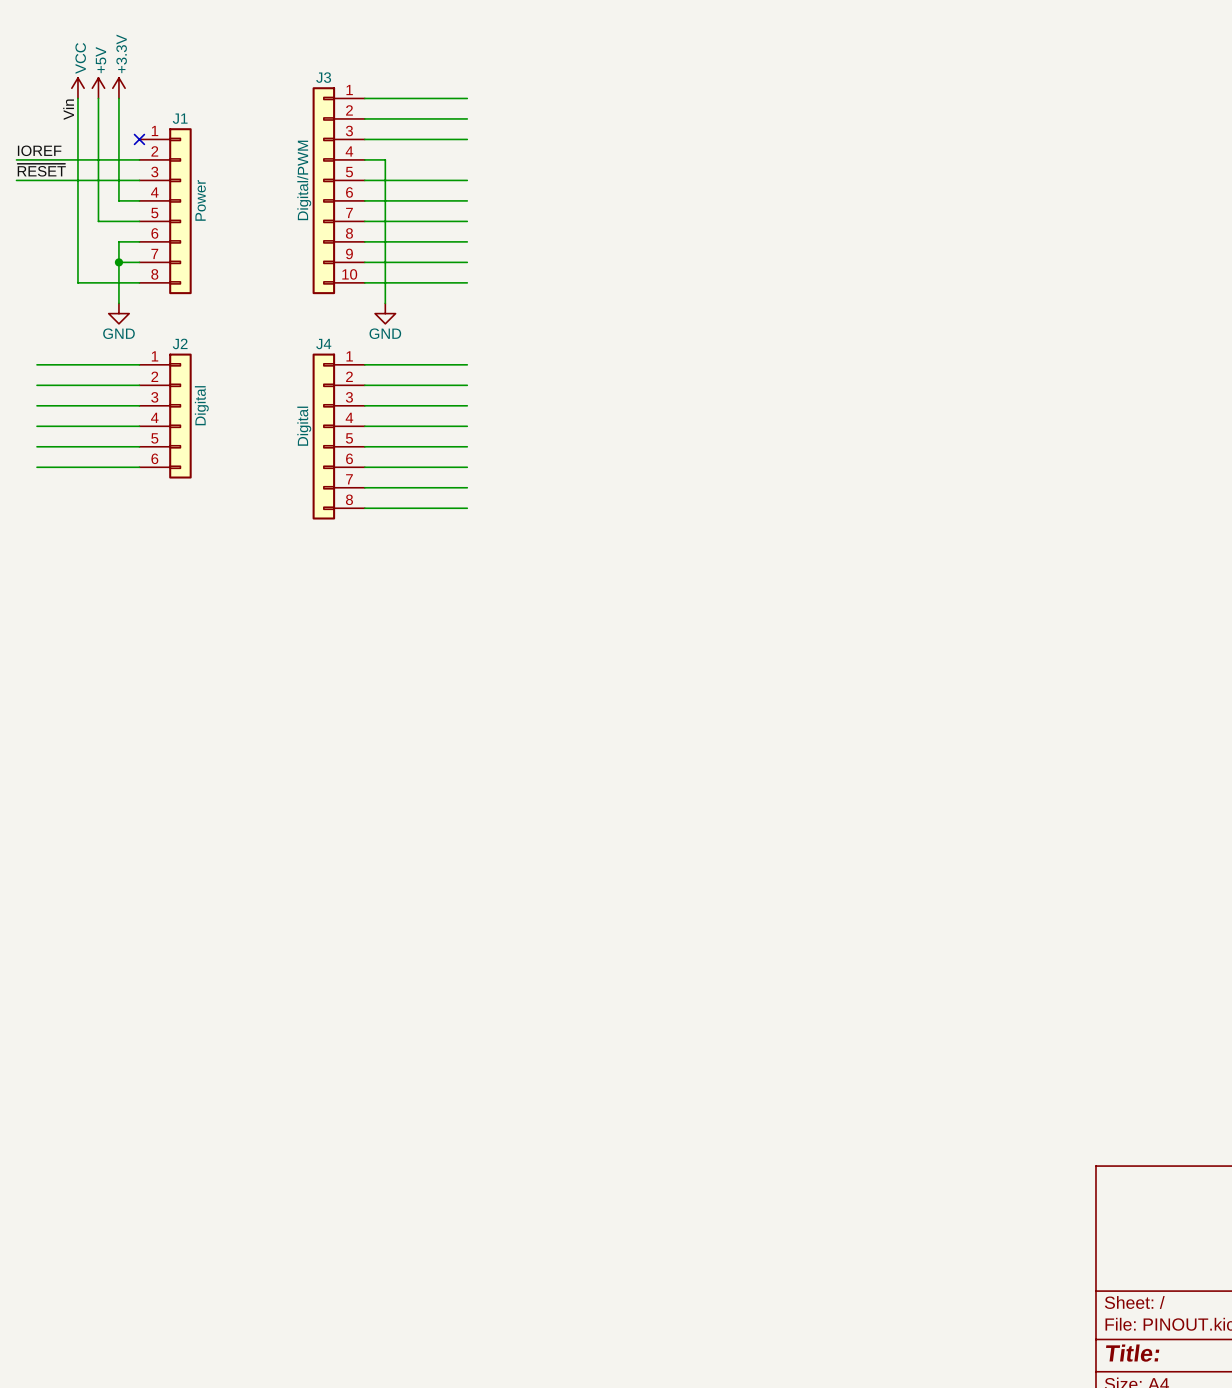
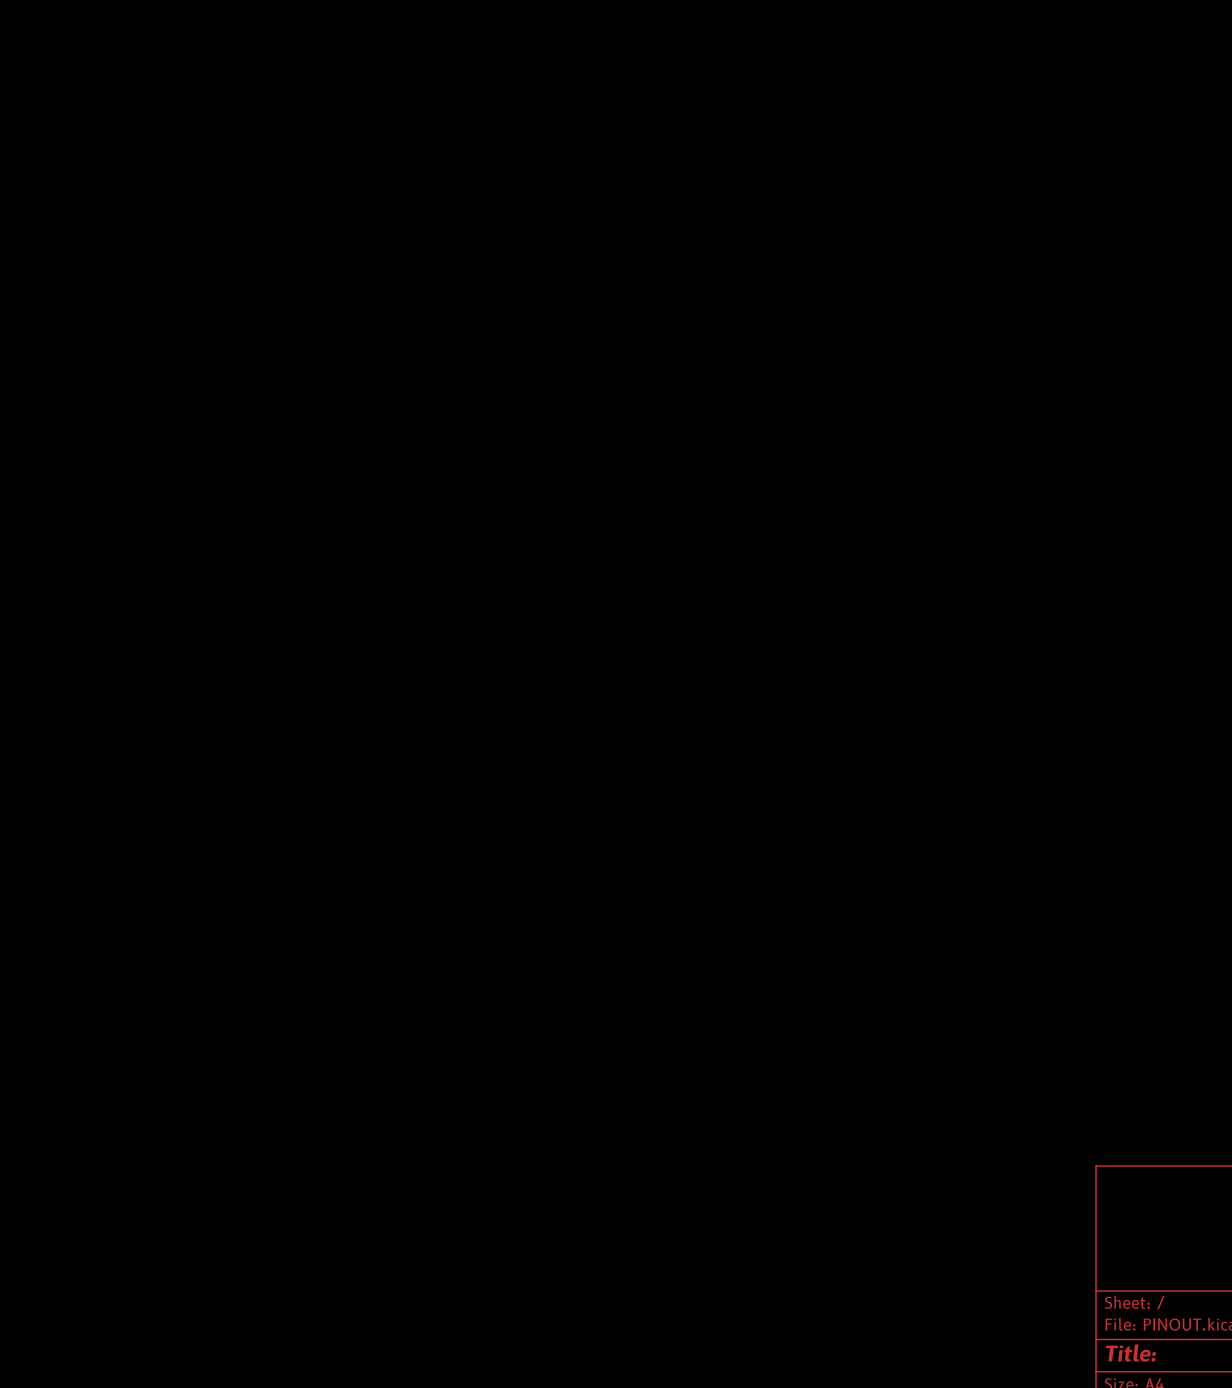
power symbol: VCC (77, 88) -> none
power symbol: +5V (98, 88) -> none
power symbol: +3.3V (118, 88) -> none
wire: (77, 98) (77, 282) (139, 282) -> none
wire: (98, 98) (98, 221) (139, 221) -> none
wire: (118, 98) (118, 200) (139, 200) -> none
wire: (364, 98) (467, 98) -> none
label: Vin (68, 109) -> none
wire: (364, 118) (467, 118) -> none
no-connect mark: (139, 139) -> none
wire: (364, 139) (467, 139) -> none
label: IOREF (39, 150) -> none
wire: (16, 159) (139, 159) -> none
wire: (364, 159) (385, 159) (385, 303) -> none
label: ~{RESET} (41, 170) -> none
wire: (16, 180) (139, 180) -> none
wire: (364, 180) (467, 180) -> none
J3: Digital/PWM (338, 190) -> none
wire: (364, 200) (467, 200) -> none
J1: Power (165, 211) -> none
wire: (364, 221) (467, 221) -> none
wire: (139, 241) (118, 241) (118, 303) -> none
wire: (364, 241) (467, 241) -> none
wire: (118, 262) (139, 262) -> none
junction: (118, 262) -> none
wire: (364, 262) (467, 262) -> none
wire: (364, 282) (467, 282) -> none
power symbol: GND (118, 313) -> none
power symbol: GND (385, 313) -> none
wire: (37, 364) (139, 364) -> none
wire: (364, 364) (467, 364) -> none
wire: (37, 385) (139, 385) -> none
wire: (364, 385) (467, 385) -> none
wire: (37, 405) (139, 405) -> none
wire: (364, 405) (467, 405) -> none
J2: Digital (165, 416) -> none
wire: (37, 426) (139, 426) -> none
wire: (364, 426) (467, 426) -> none
J4: Digital (338, 436) -> none
wire: (37, 446) (139, 446) -> none
wire: (364, 446) (467, 446) -> none
wire: (37, 467) (139, 467) -> none
wire: (364, 467) (467, 467) -> none
wire: (364, 487) (467, 487) -> none
wire: (364, 508) (467, 508) -> none

